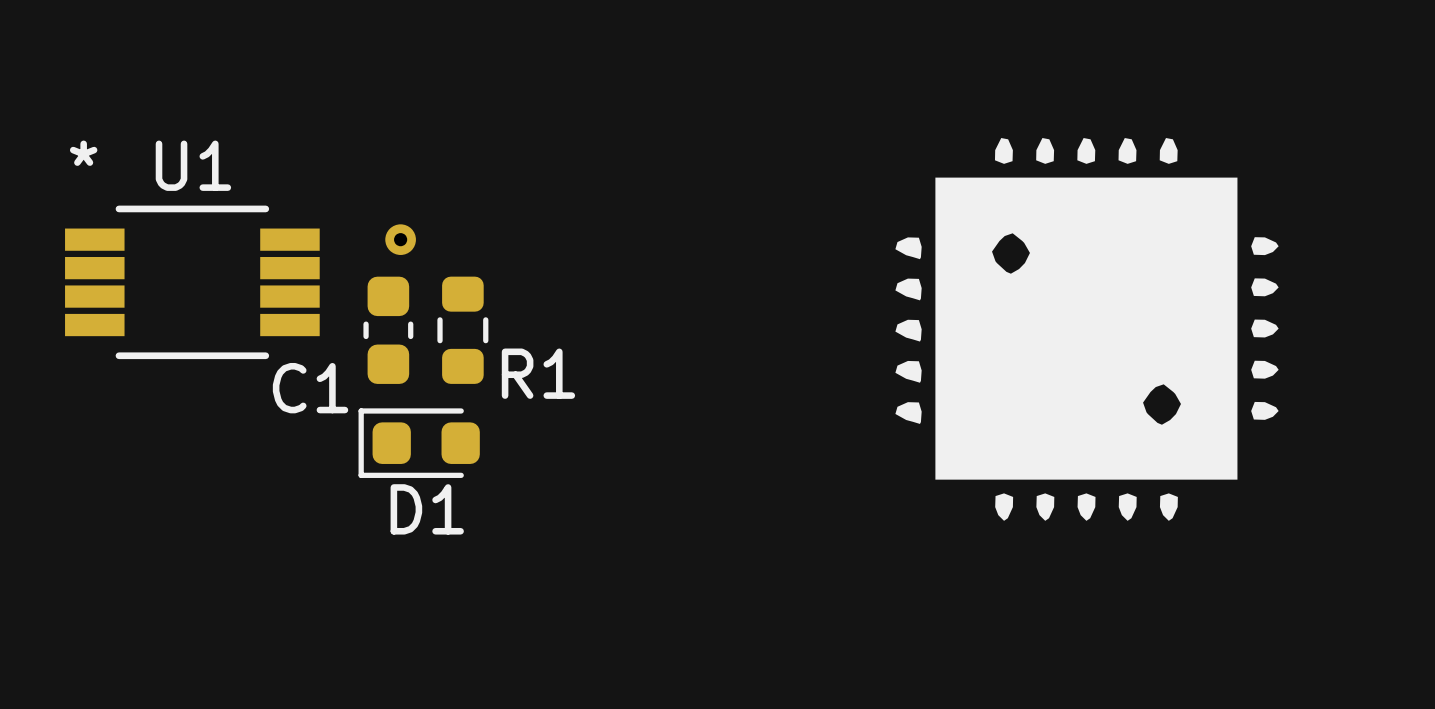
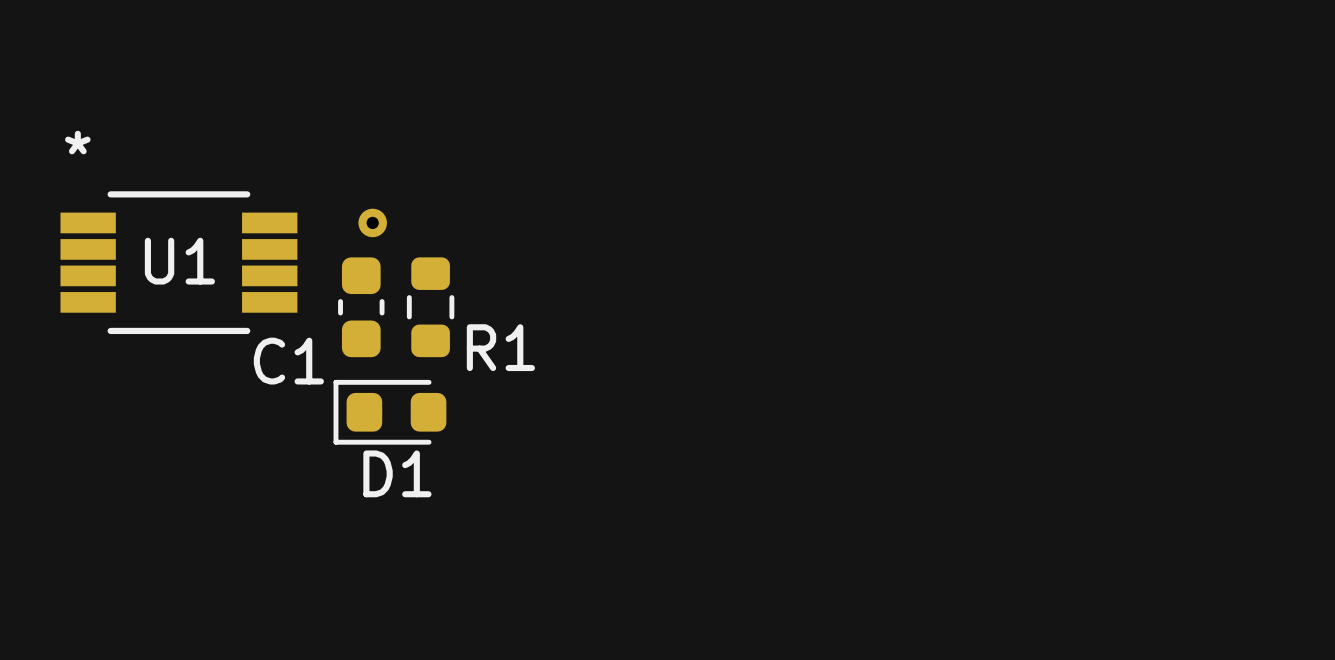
drawing: [895, 138, 1279, 521] -> none
U1 name position: U1 (193, 165) -> U1 (179, 261)

